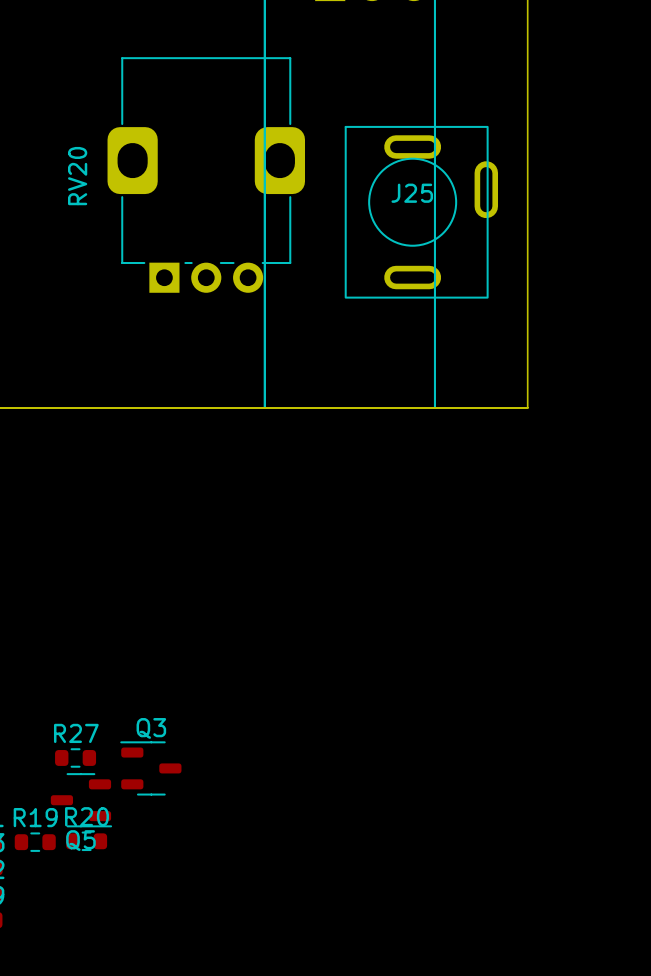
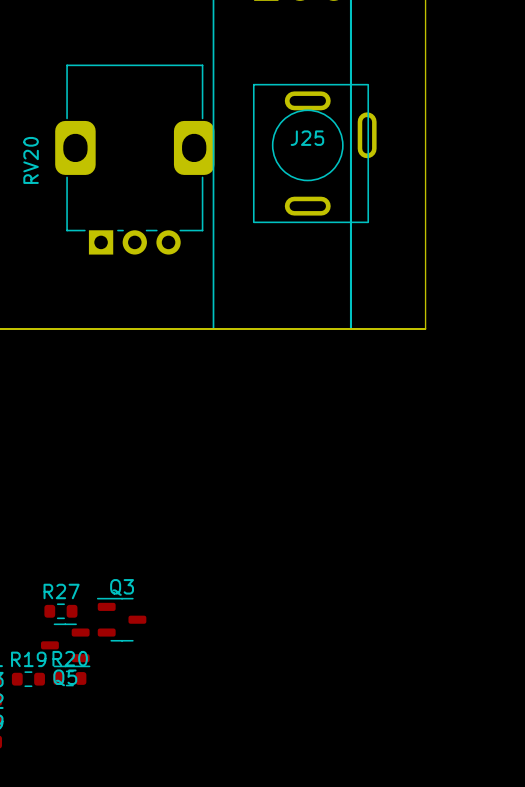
RV20 position: (206, 174) -> (134, 159)
J25 position: (421, 212) -> (314, 153)

